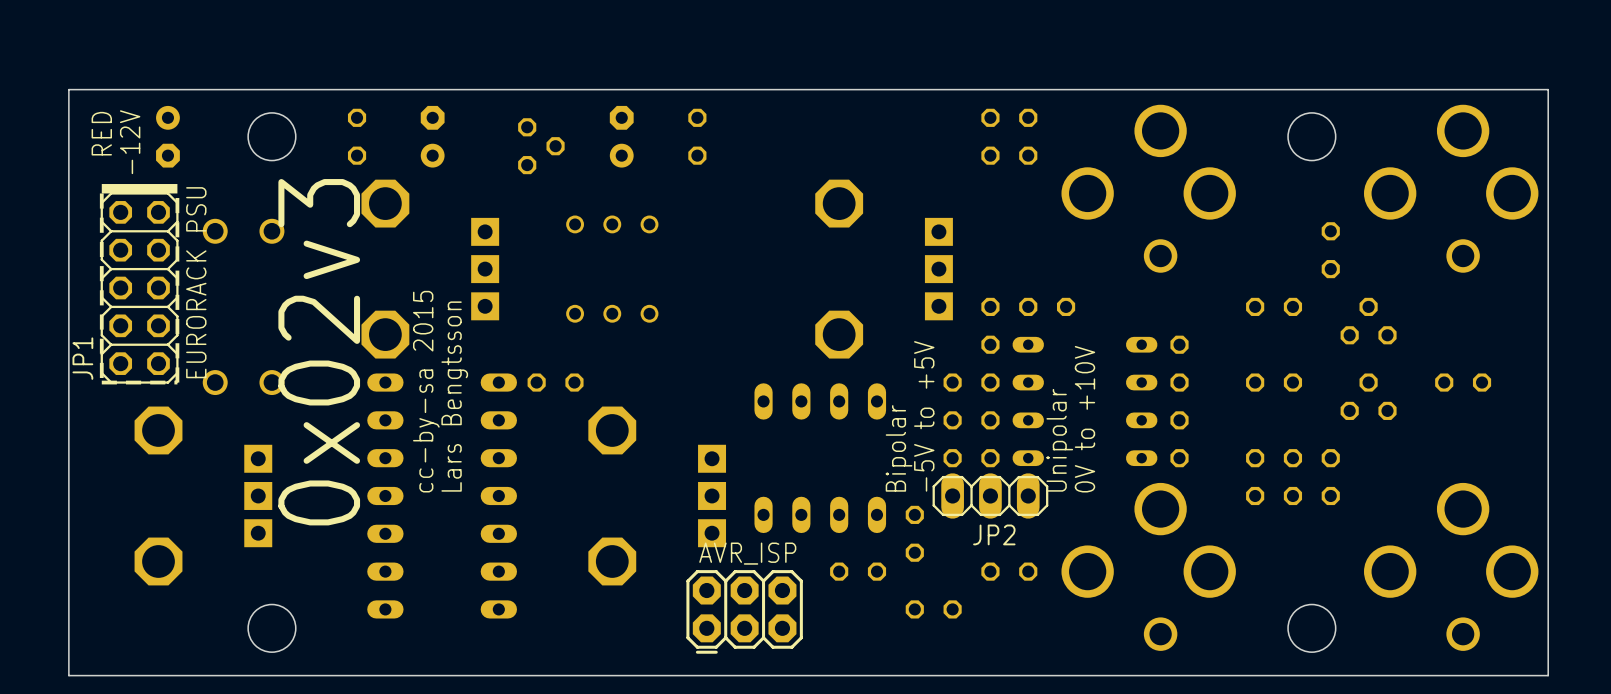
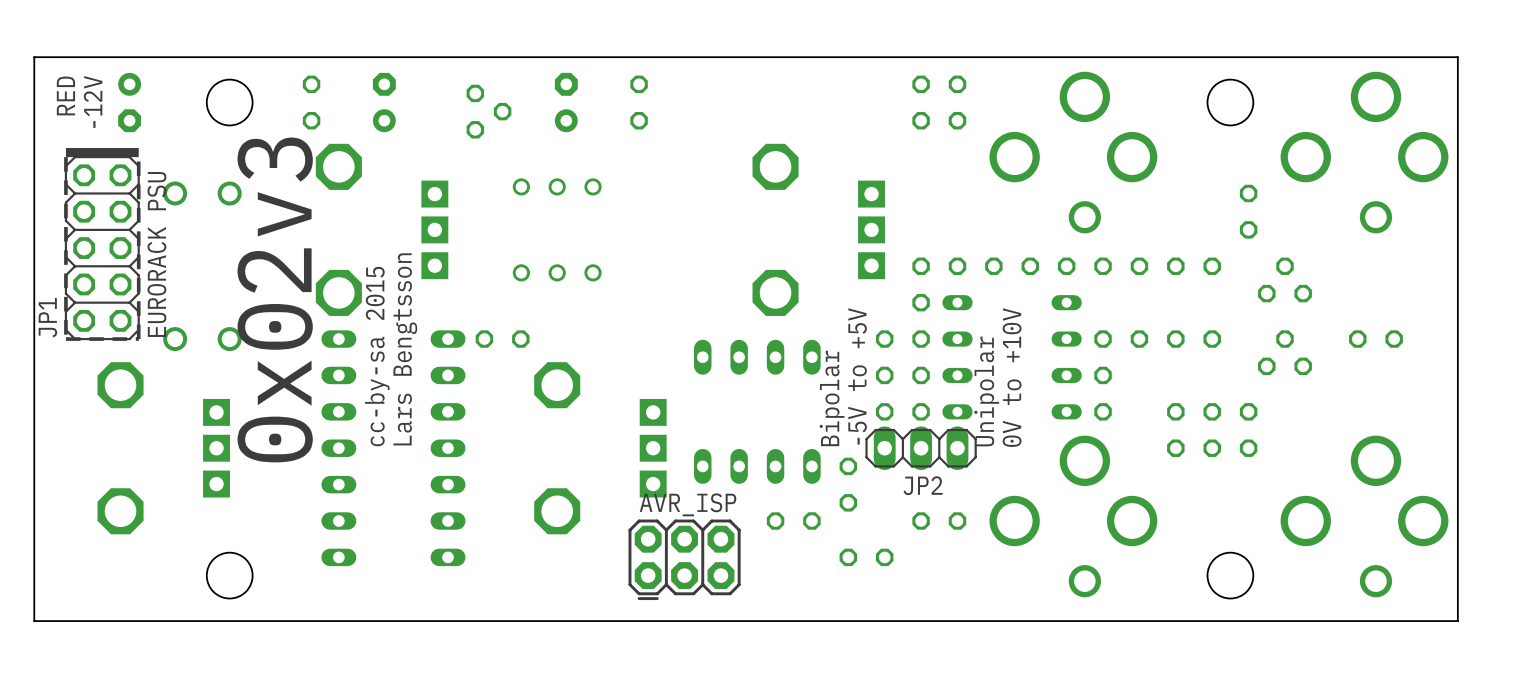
part: none -> (1048, 266)
part: none -> (1121, 266)
part rotation: 0° (1179, 363) -> 90° clockwise (1121, 339)

